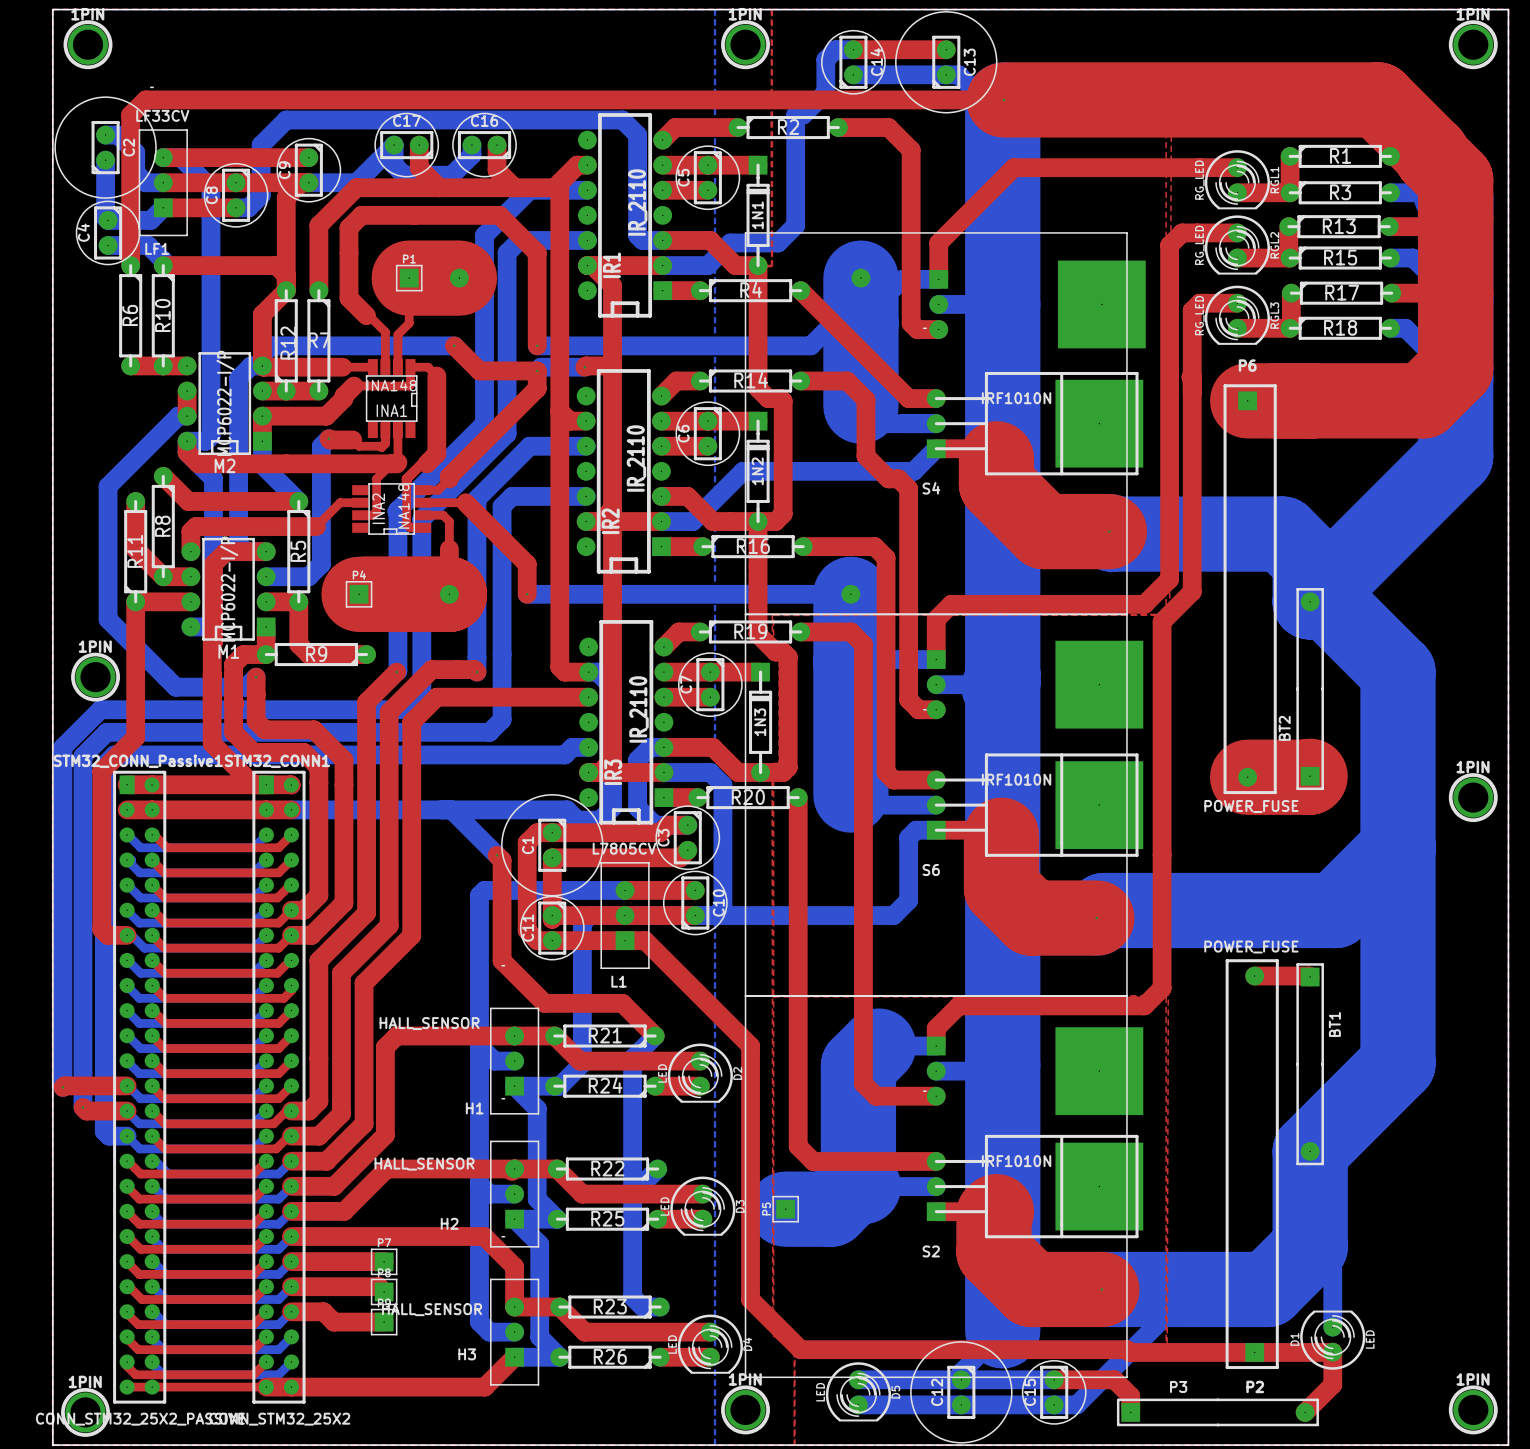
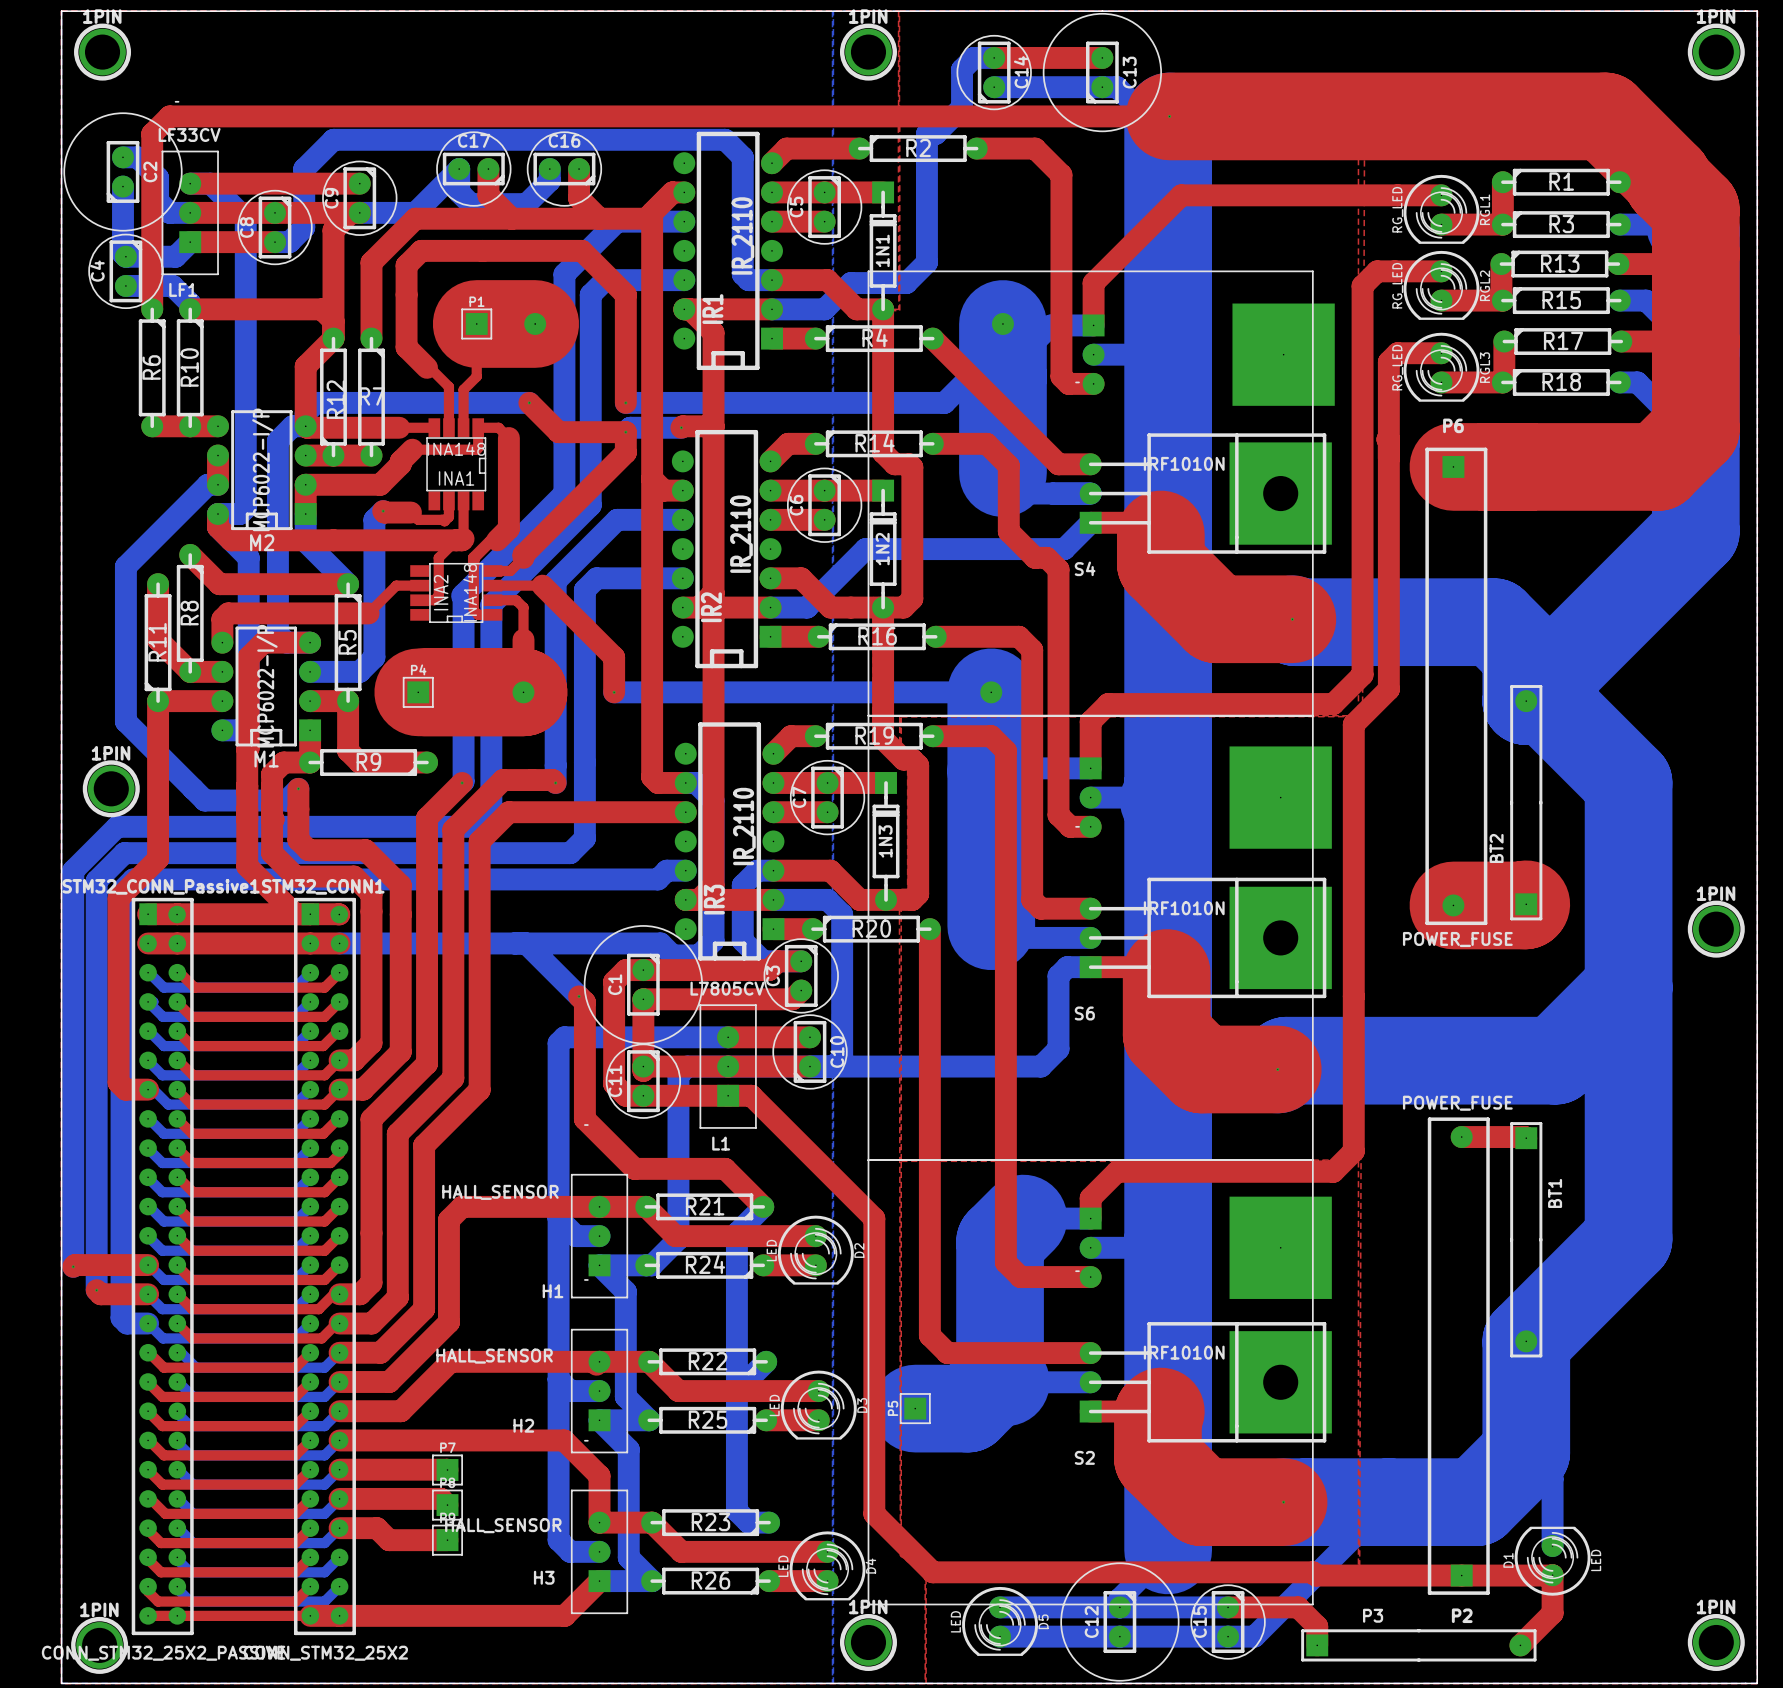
S4 footprint: [744, 232, 1144, 616] -> [867, 270, 1332, 717]
S6 footprint: [744, 613, 1144, 997] -> [867, 714, 1332, 1161]
S2 footprint: [744, 995, 1144, 1379] -> [867, 1159, 1332, 1606]

